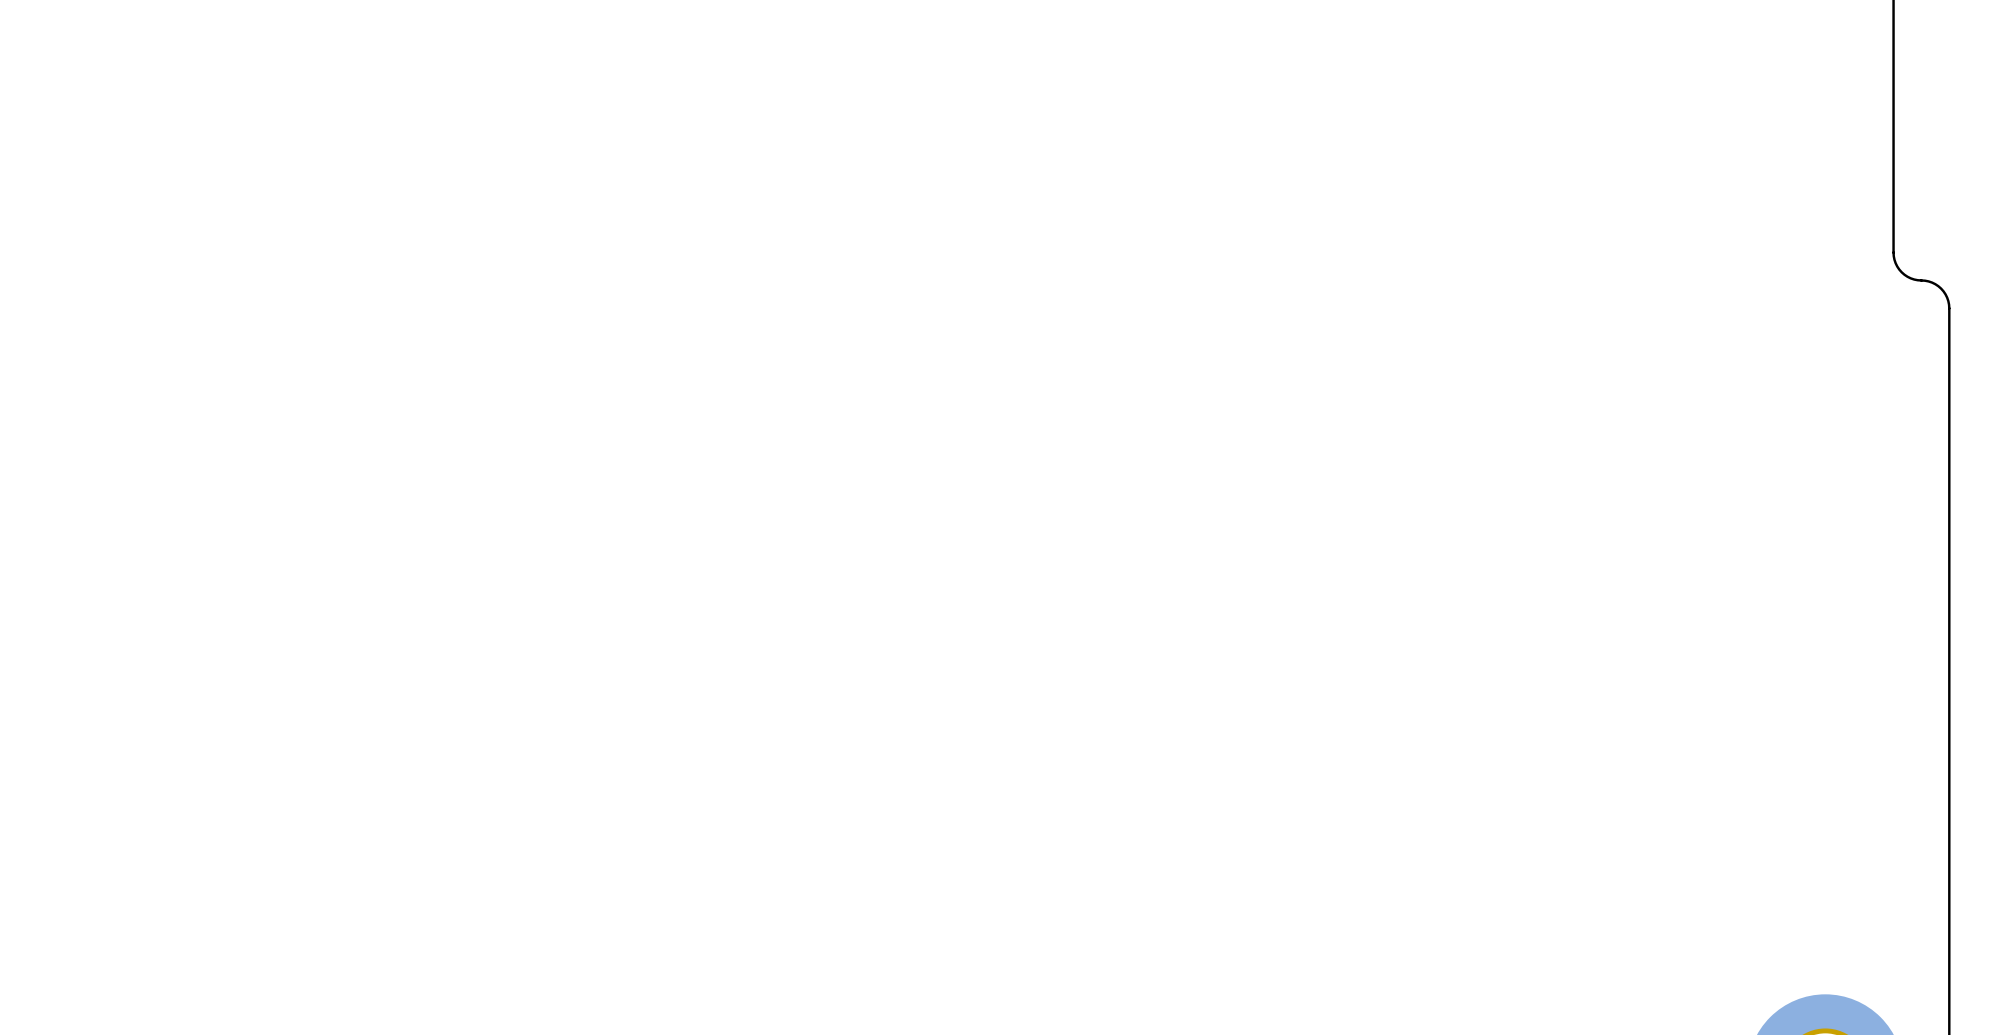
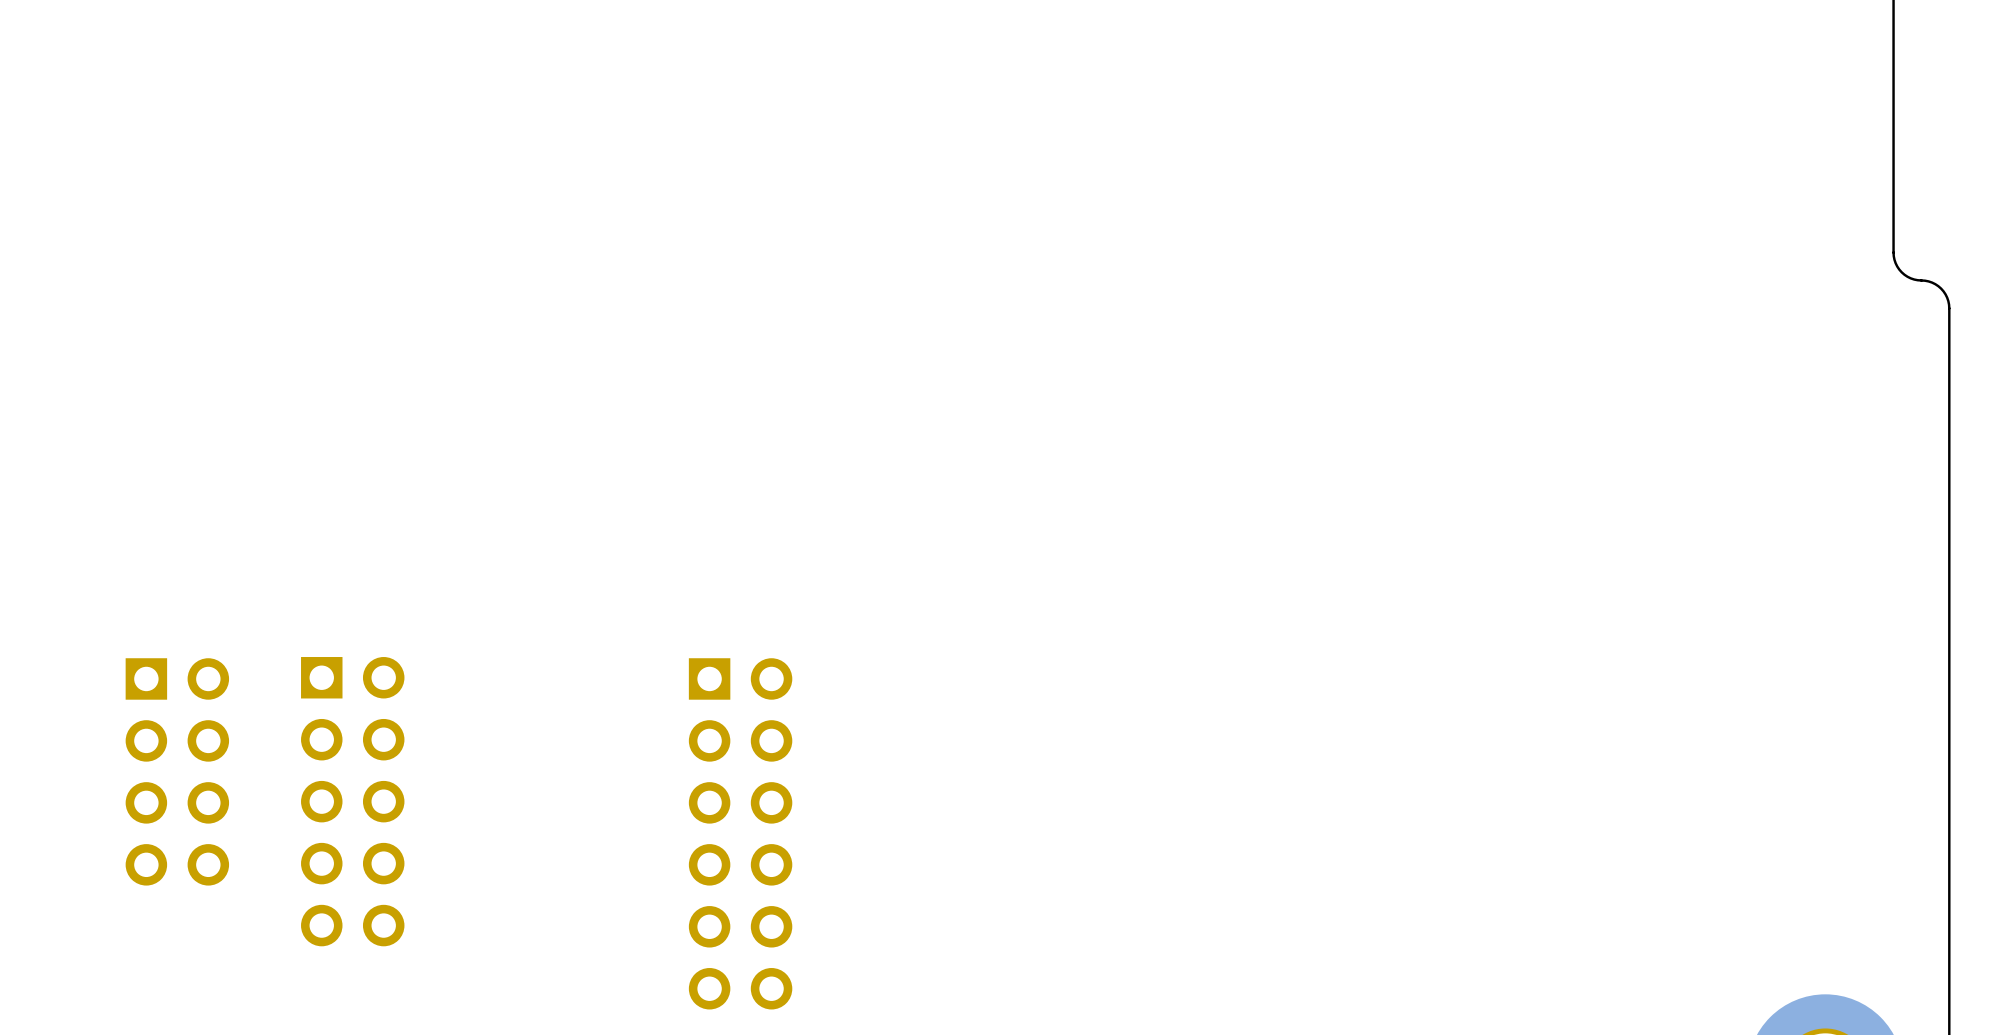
part: none -> (177, 771)
part: none -> (352, 801)
part: none -> (740, 833)

